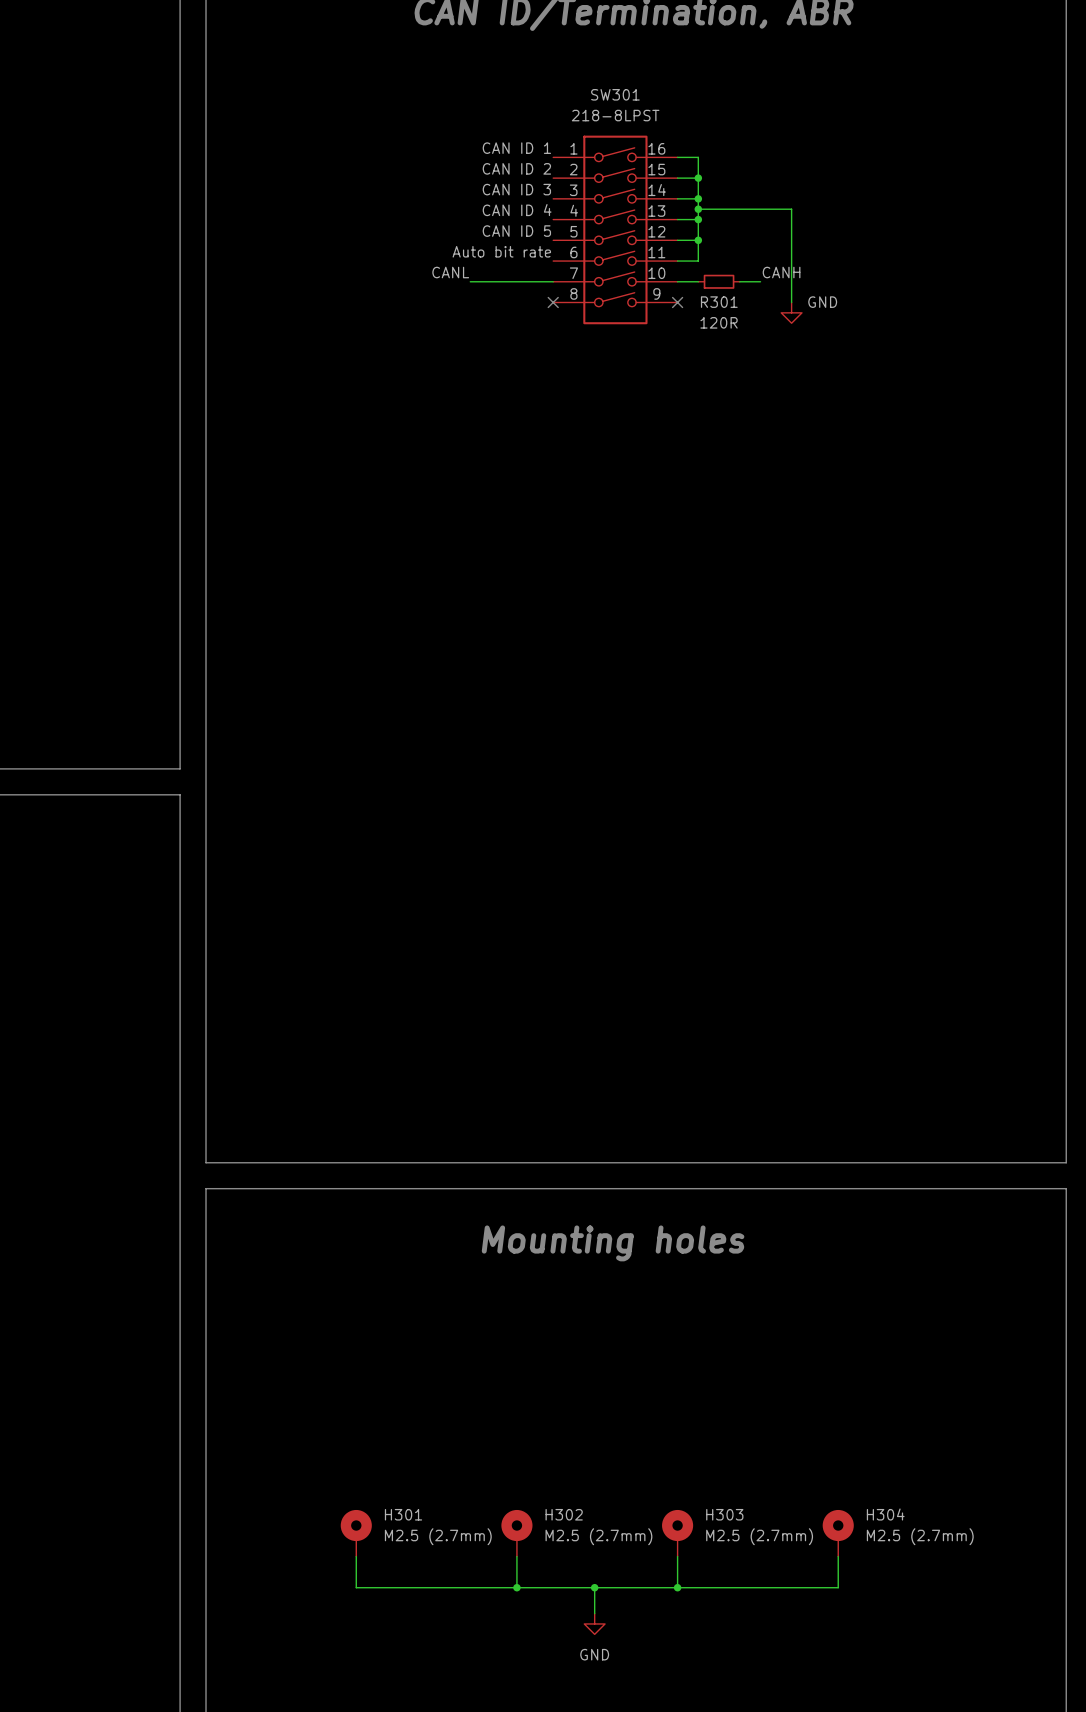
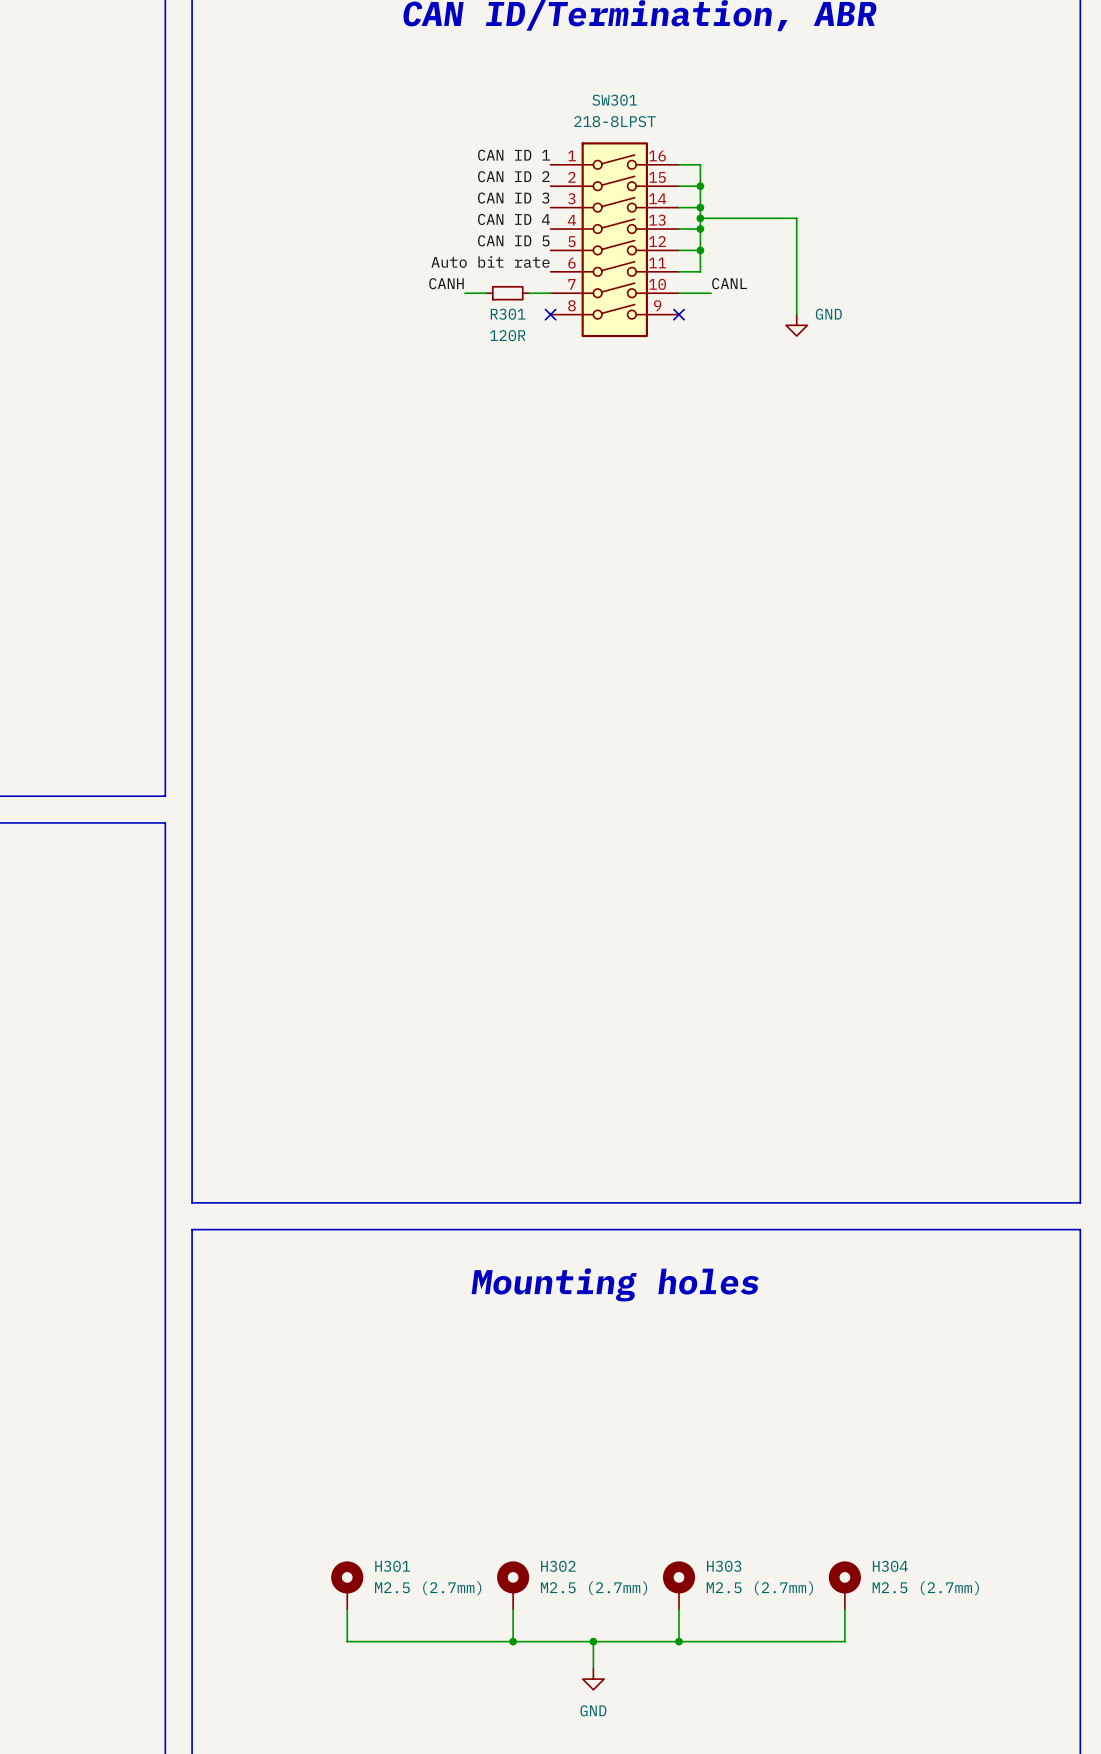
label: CANL (450, 272) -> CANH (446, 283)
label: none -> CANL (729, 283)
label: CANH (781, 272) -> none
wire: (491, 281) (532, 281) -> none
R301 position: (719, 281) -> (507, 293)
wire: (739, 281) (760, 281) -> none

